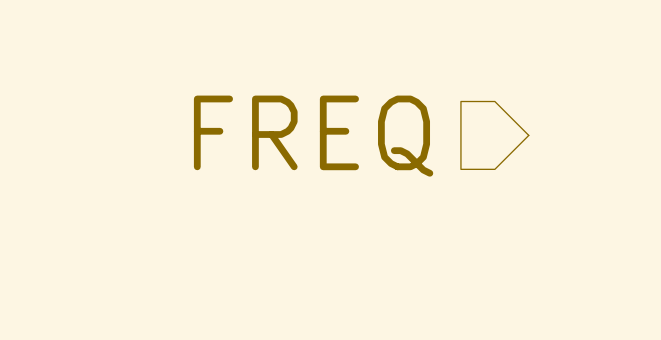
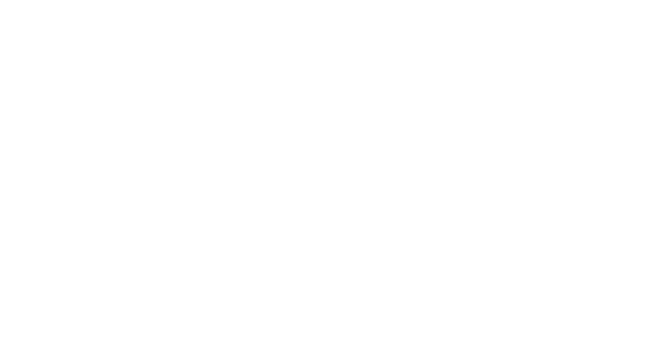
hierarchical label: FREQ (313, 136) -> none

